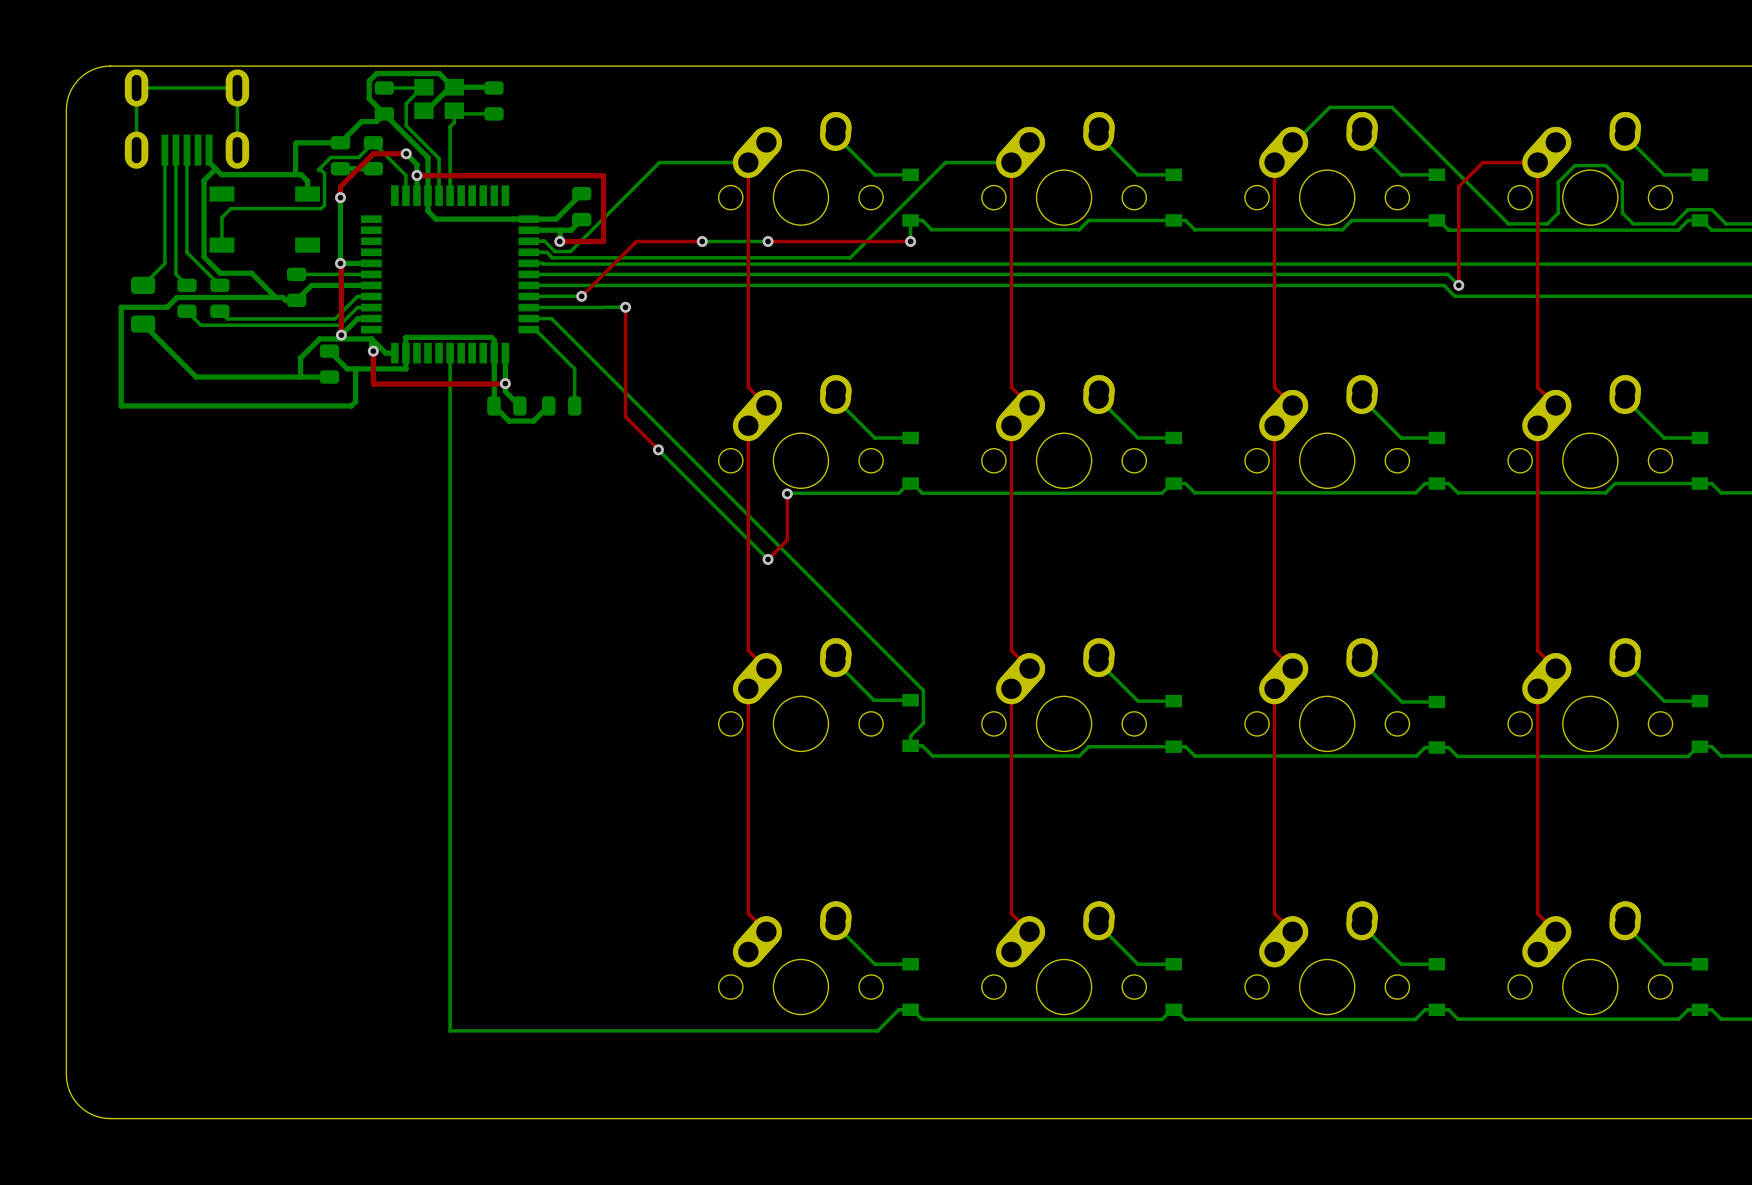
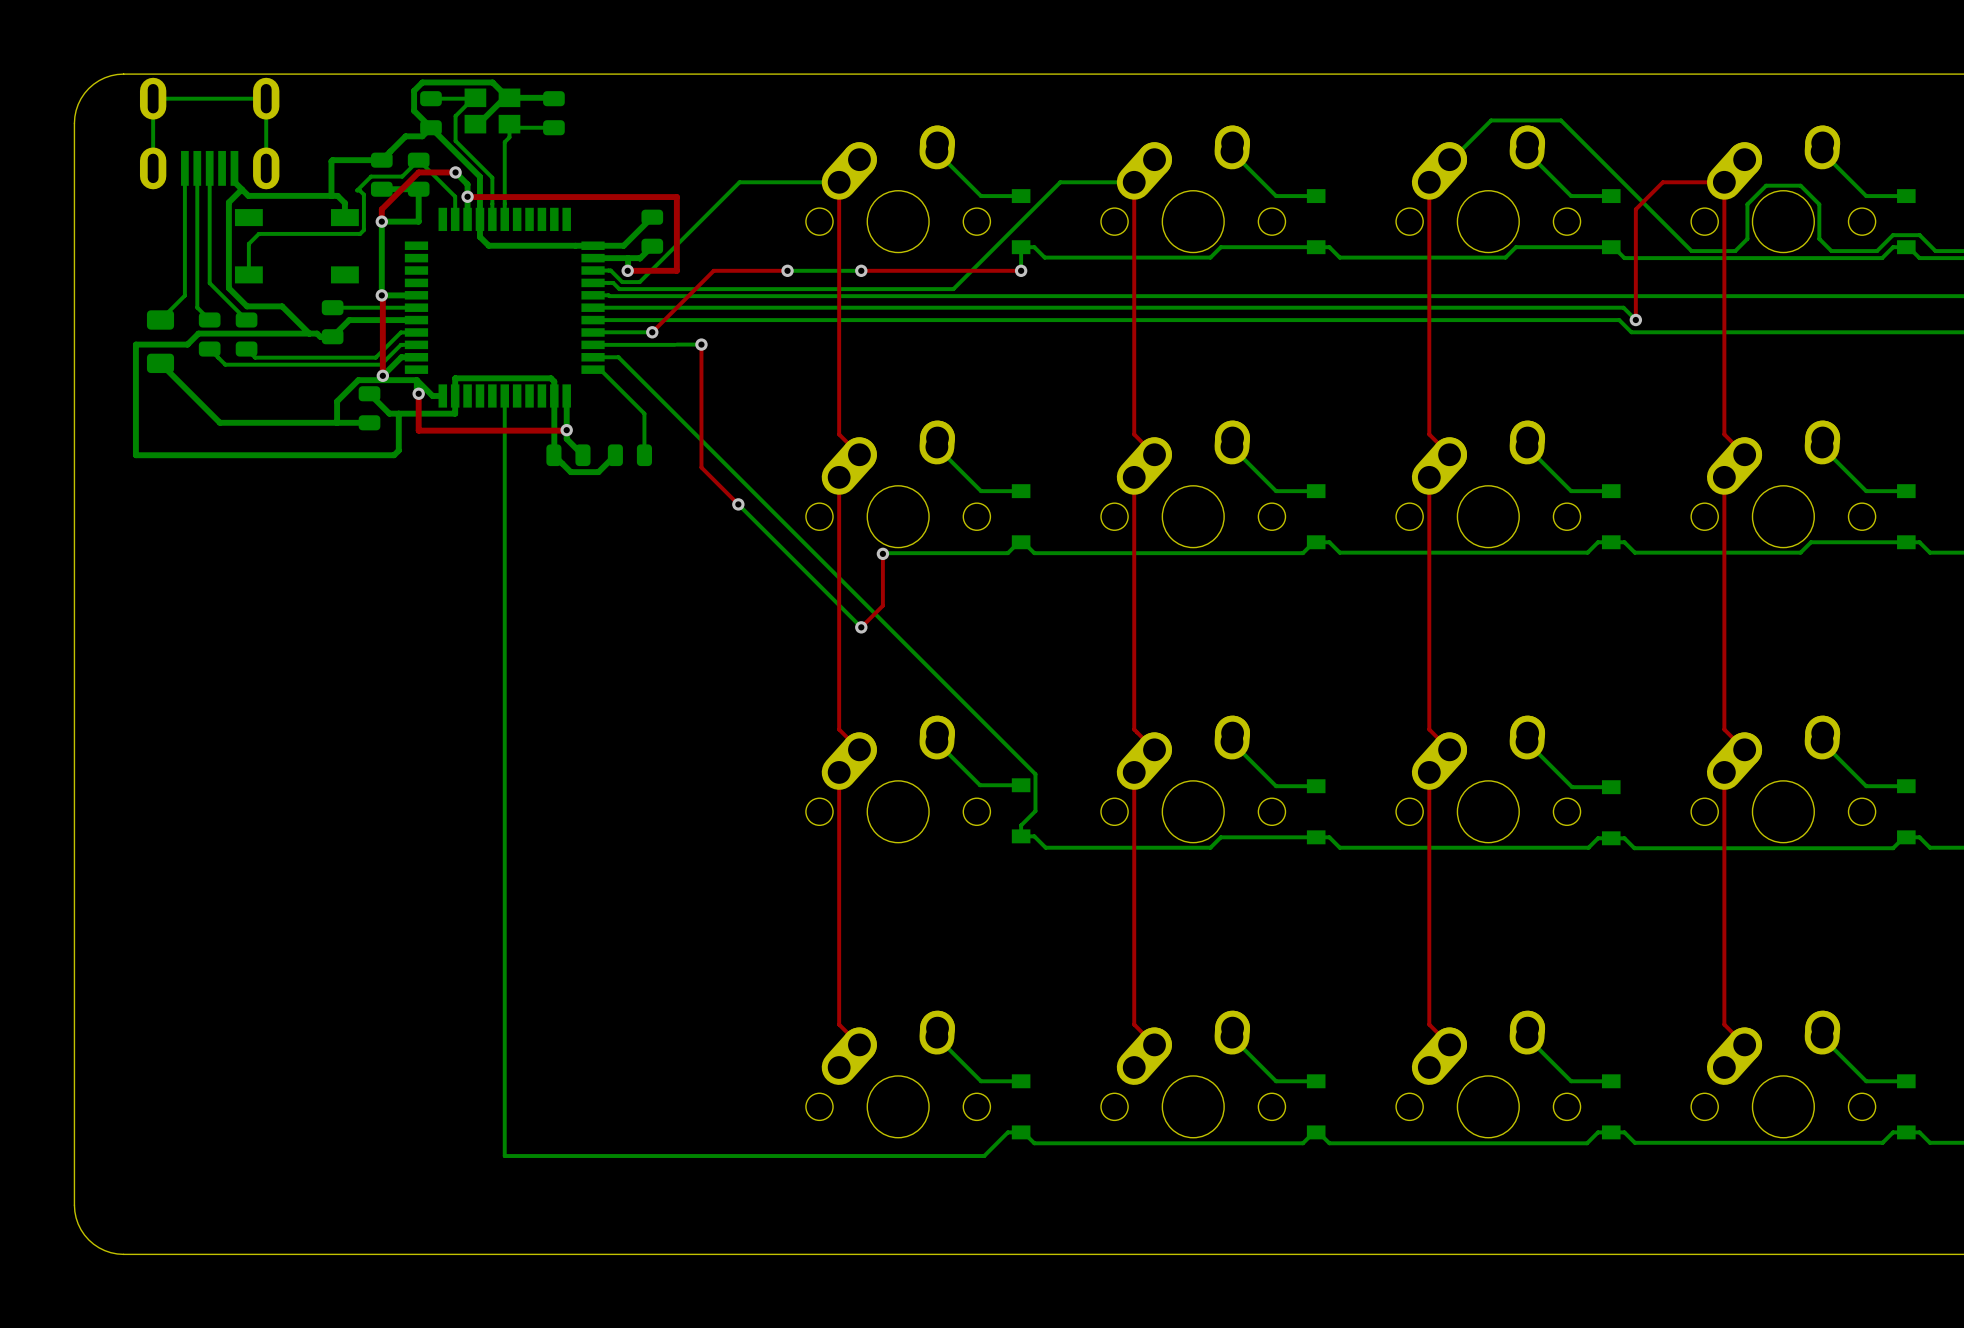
bottom track: none -> (418, 189) (418, 221) (381, 221)

